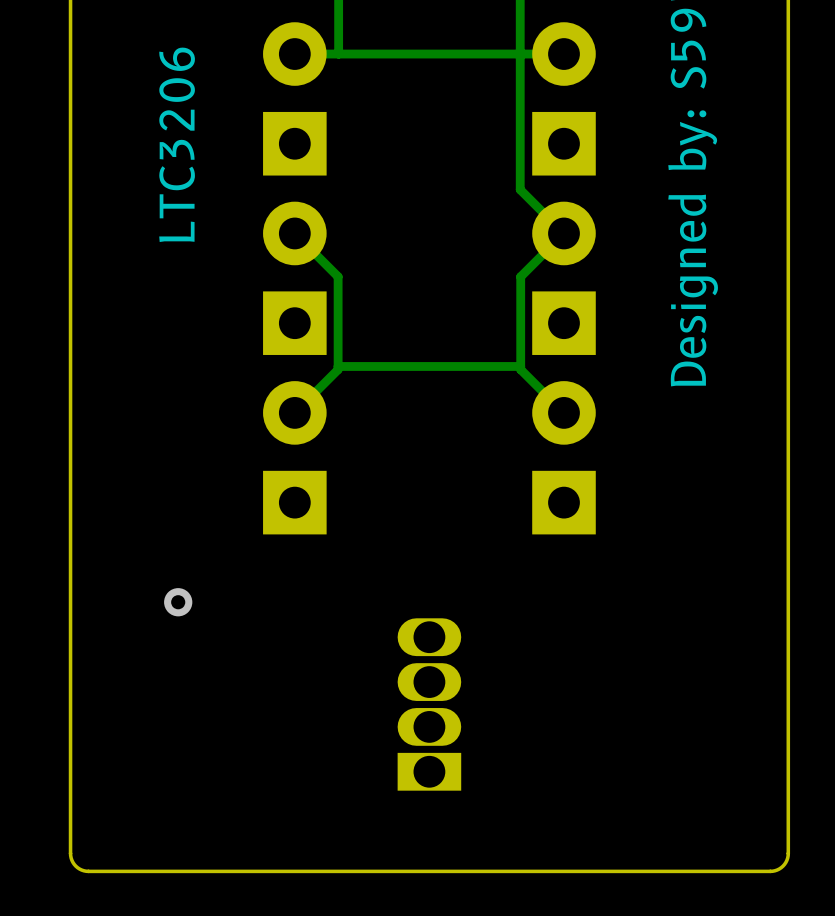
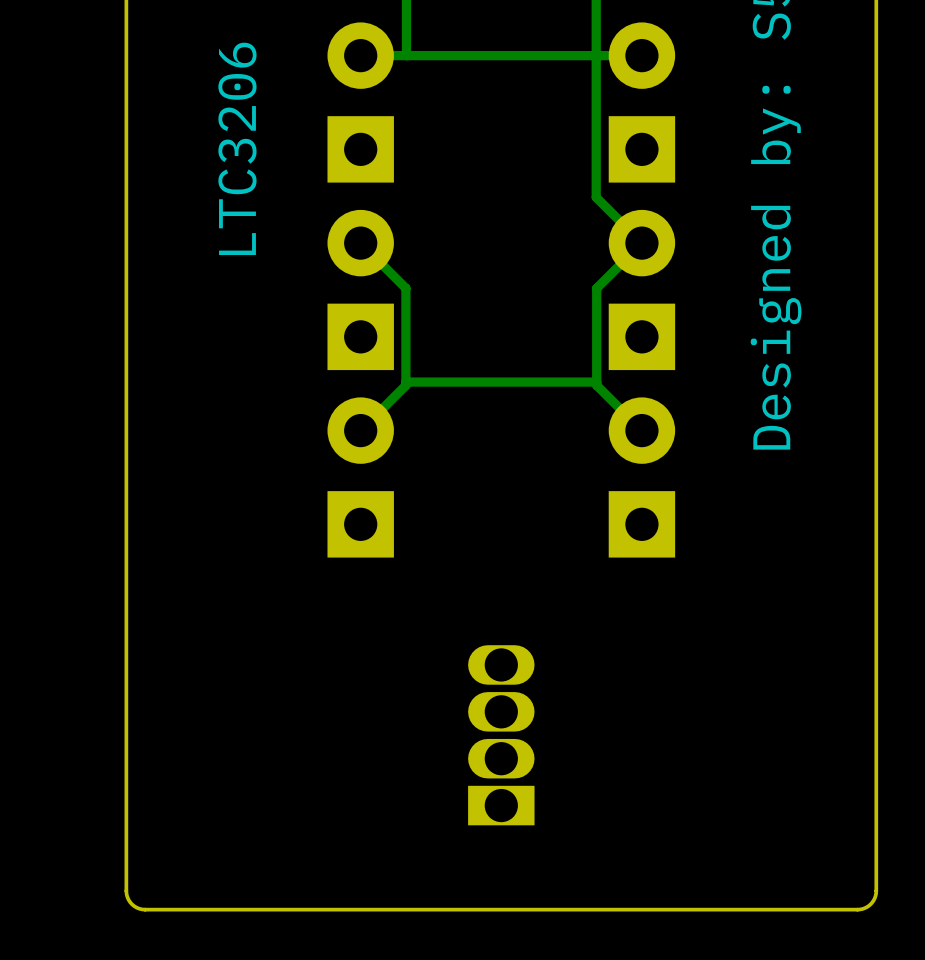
via: (178, 602) -> none

